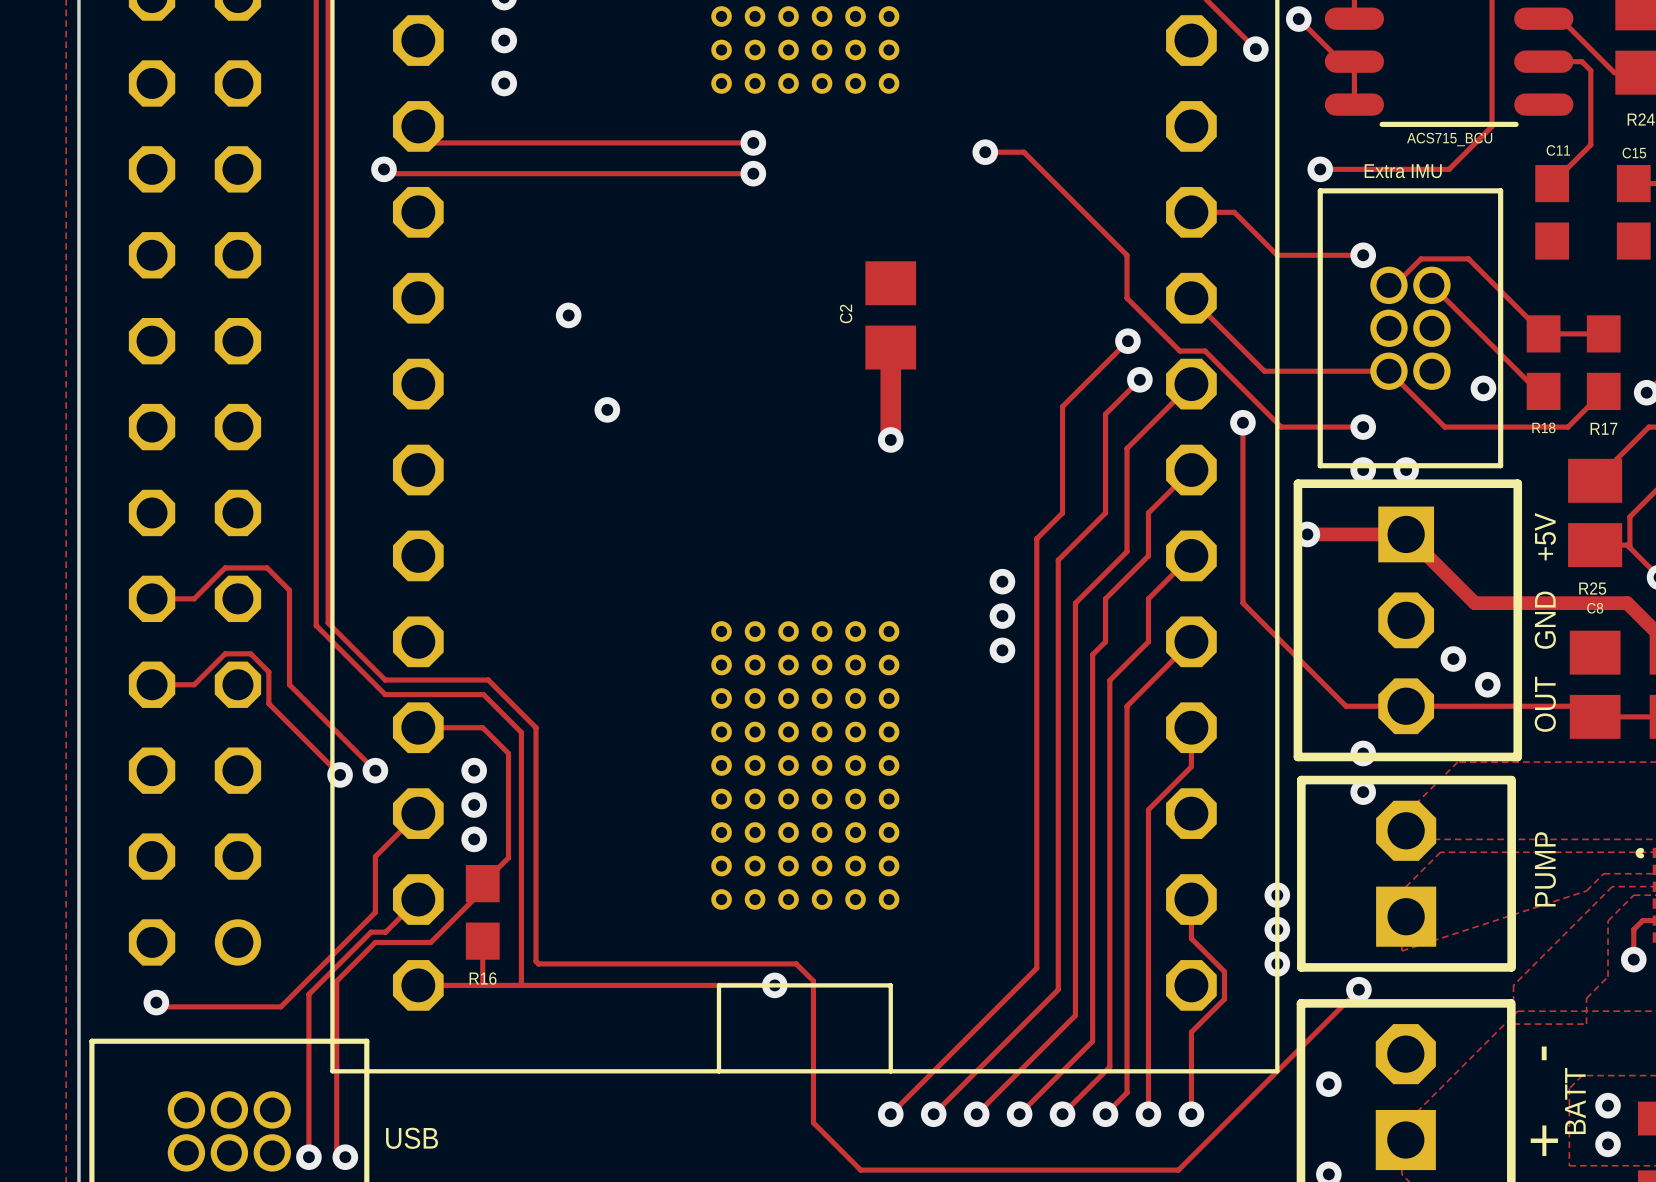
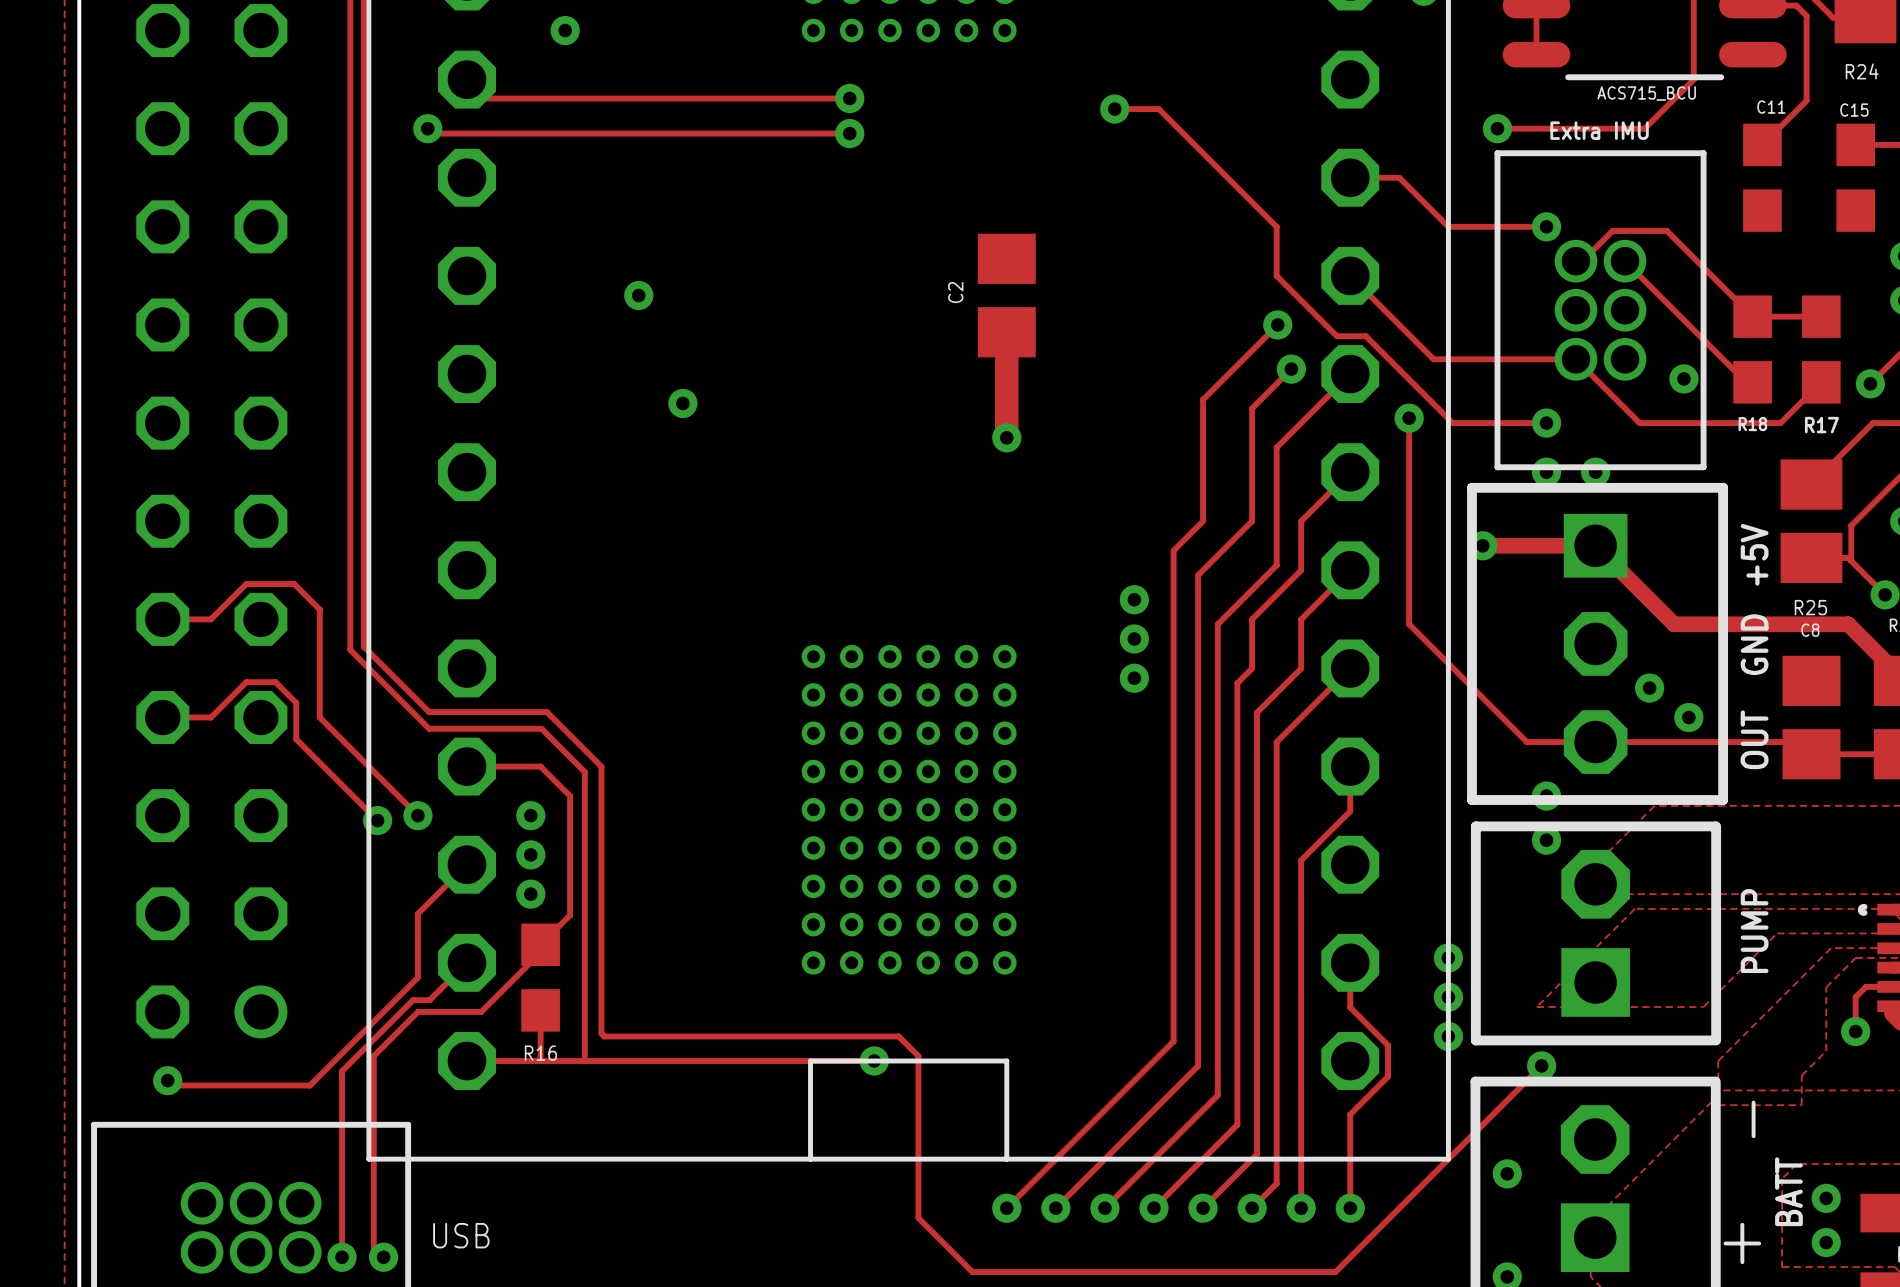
zone outline: (1603, 873) (1586, 890) (1401, 951) (1401, 890) -> (1821, 933) (1777, 933) (1703, 1007) (1536, 1007) (1590, 953)

